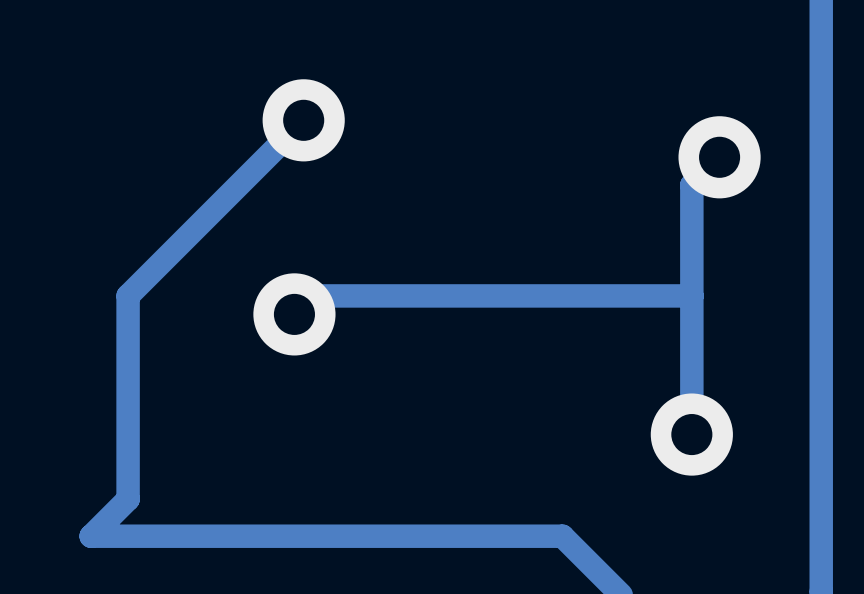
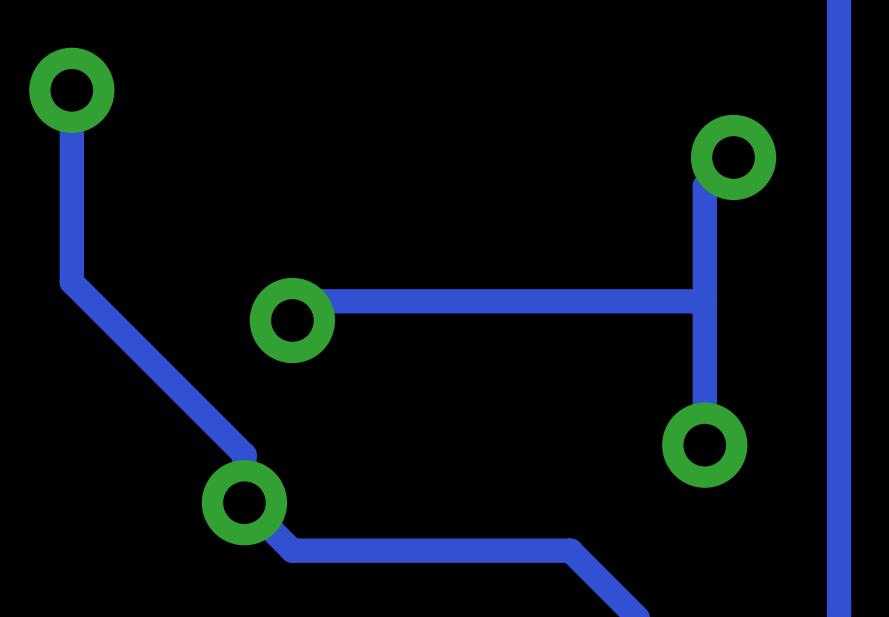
via: none -> (71, 90)
track: (303, 120) (128, 295) (128, 499) (91, 536) (294, 536) -> (71, 90) (71, 282) (244, 454) (244, 502) (292, 550)
via: (303, 120) -> none
via: none -> (244, 502)

